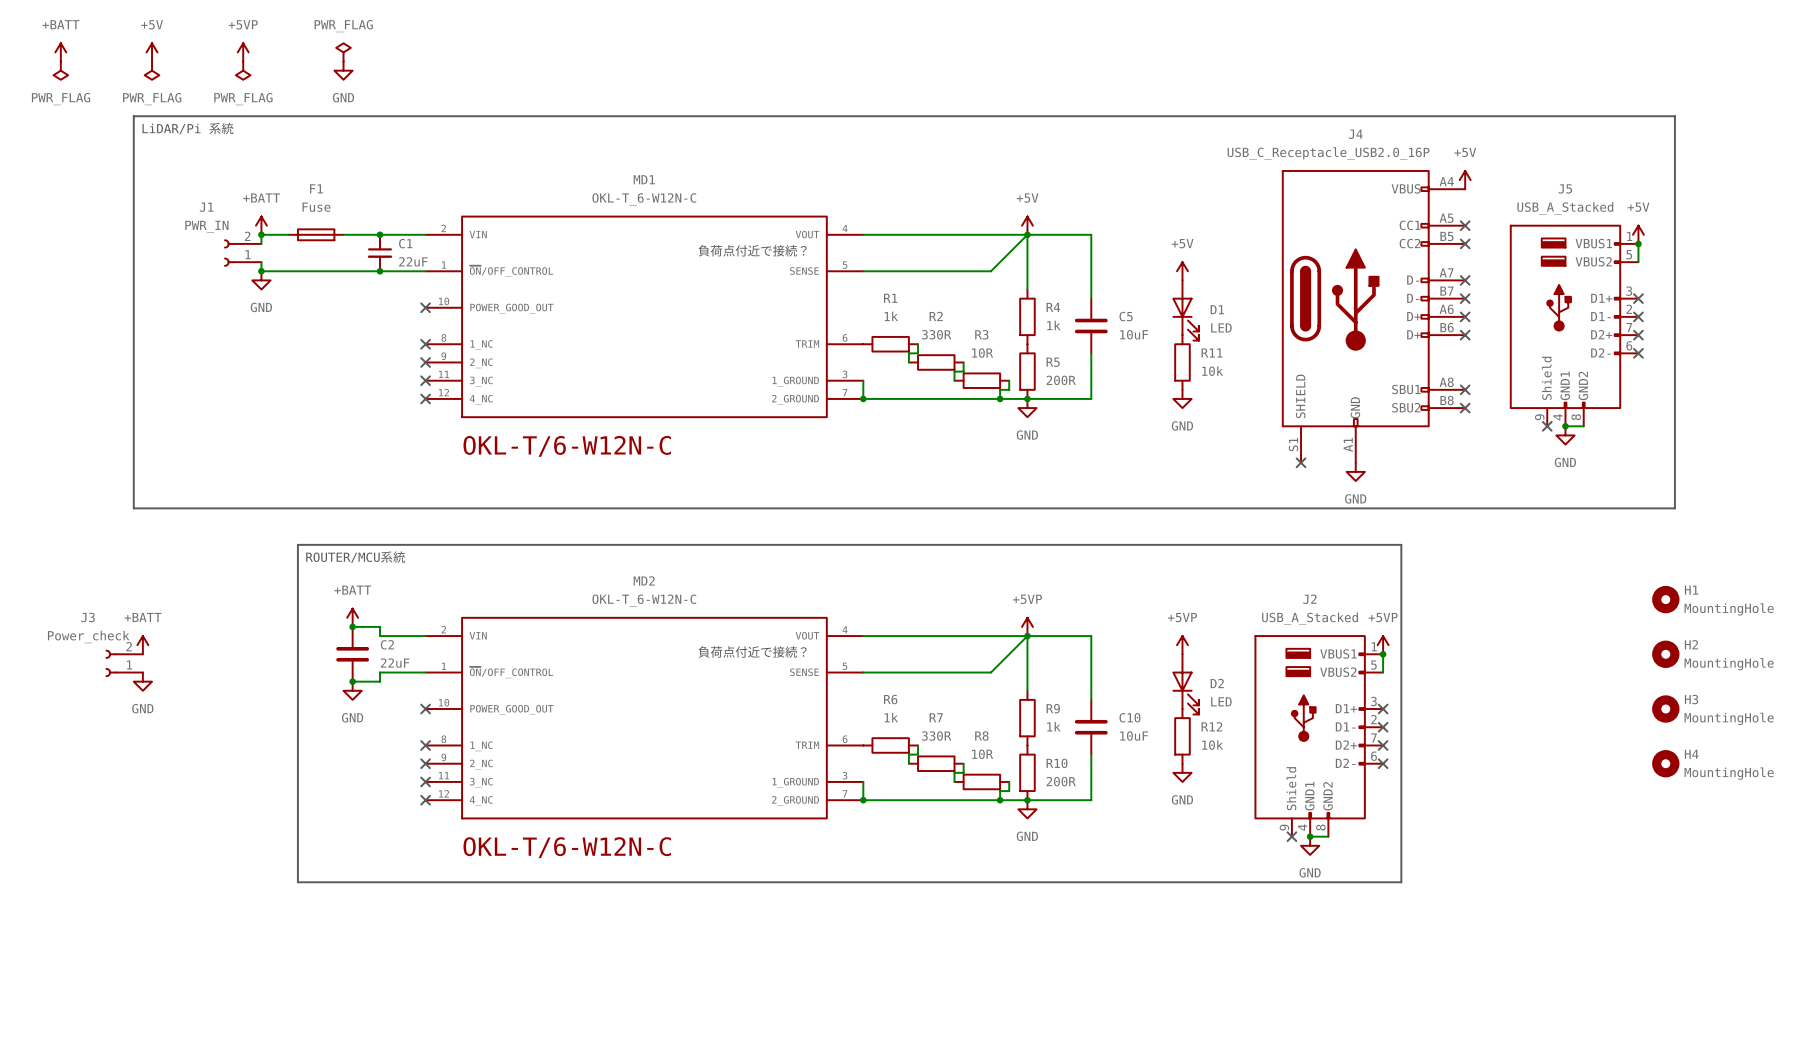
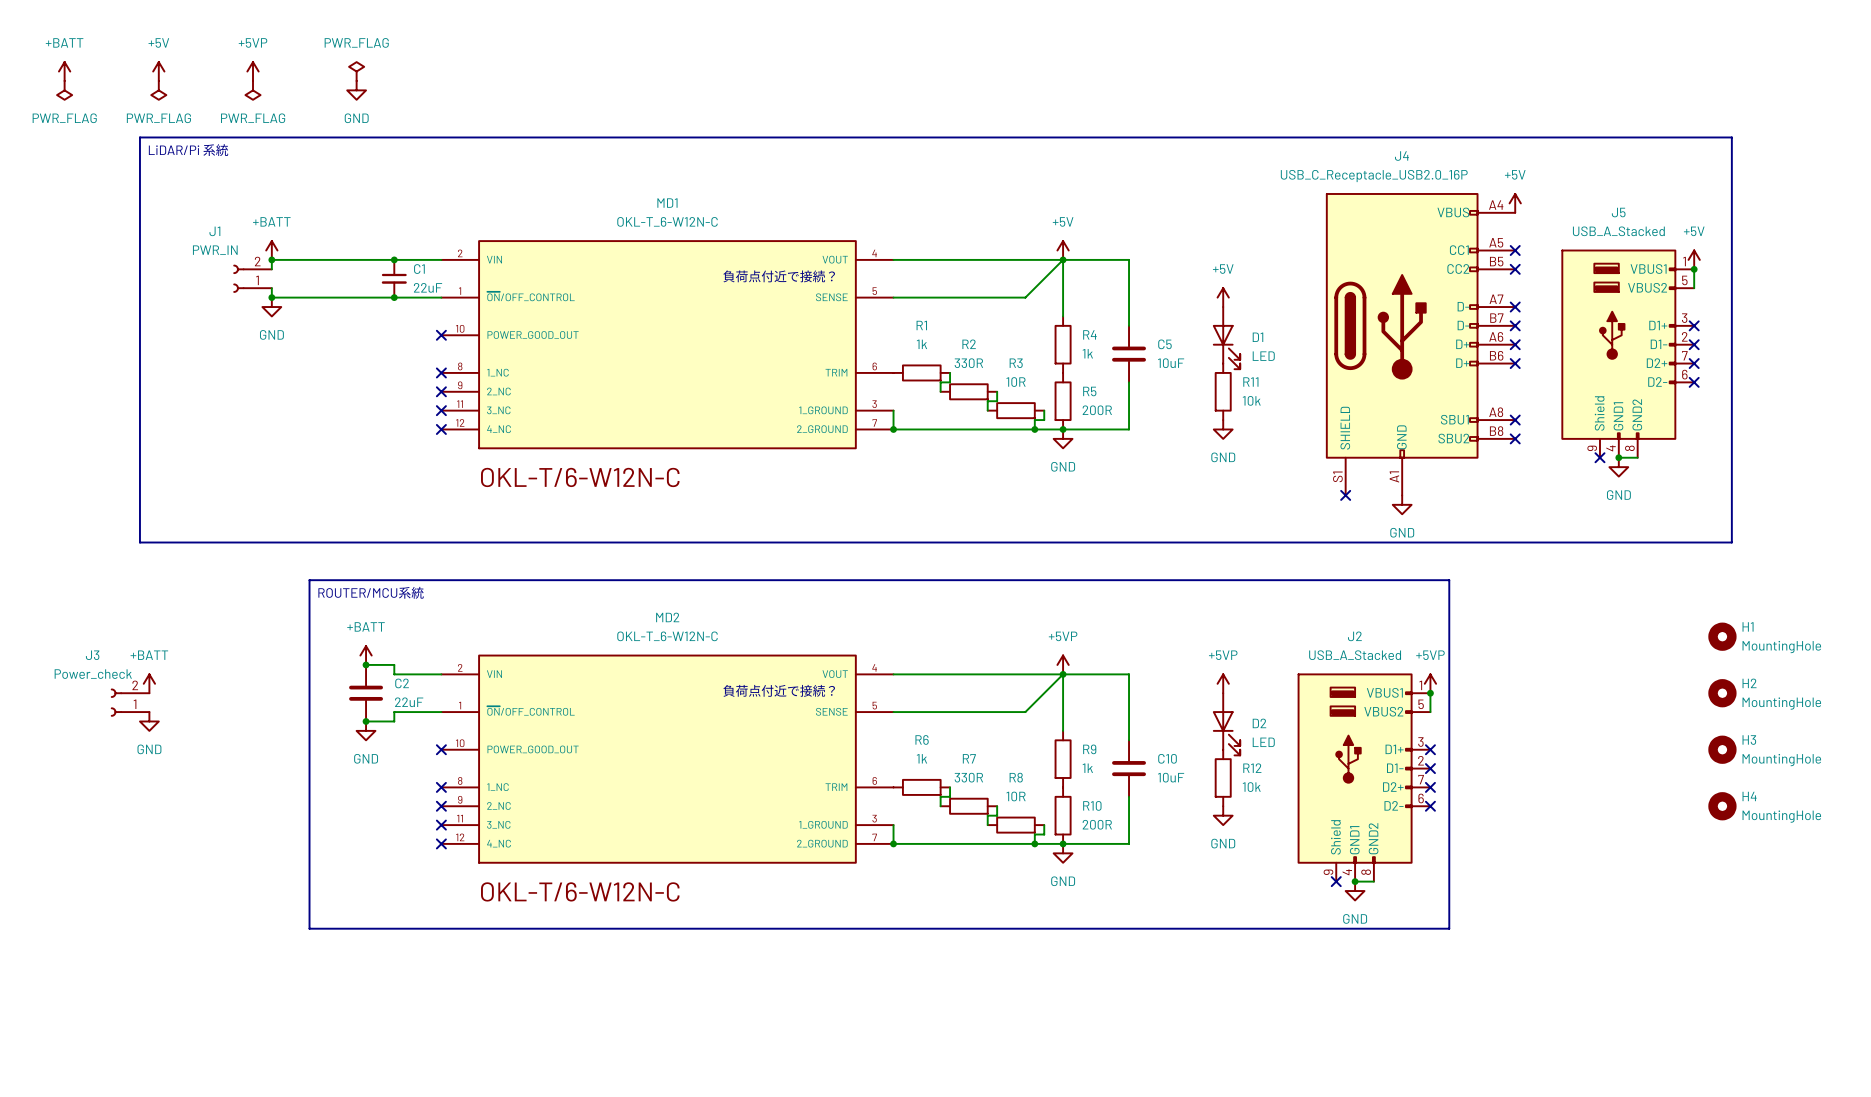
F1: Fuse (316, 234) -> none

